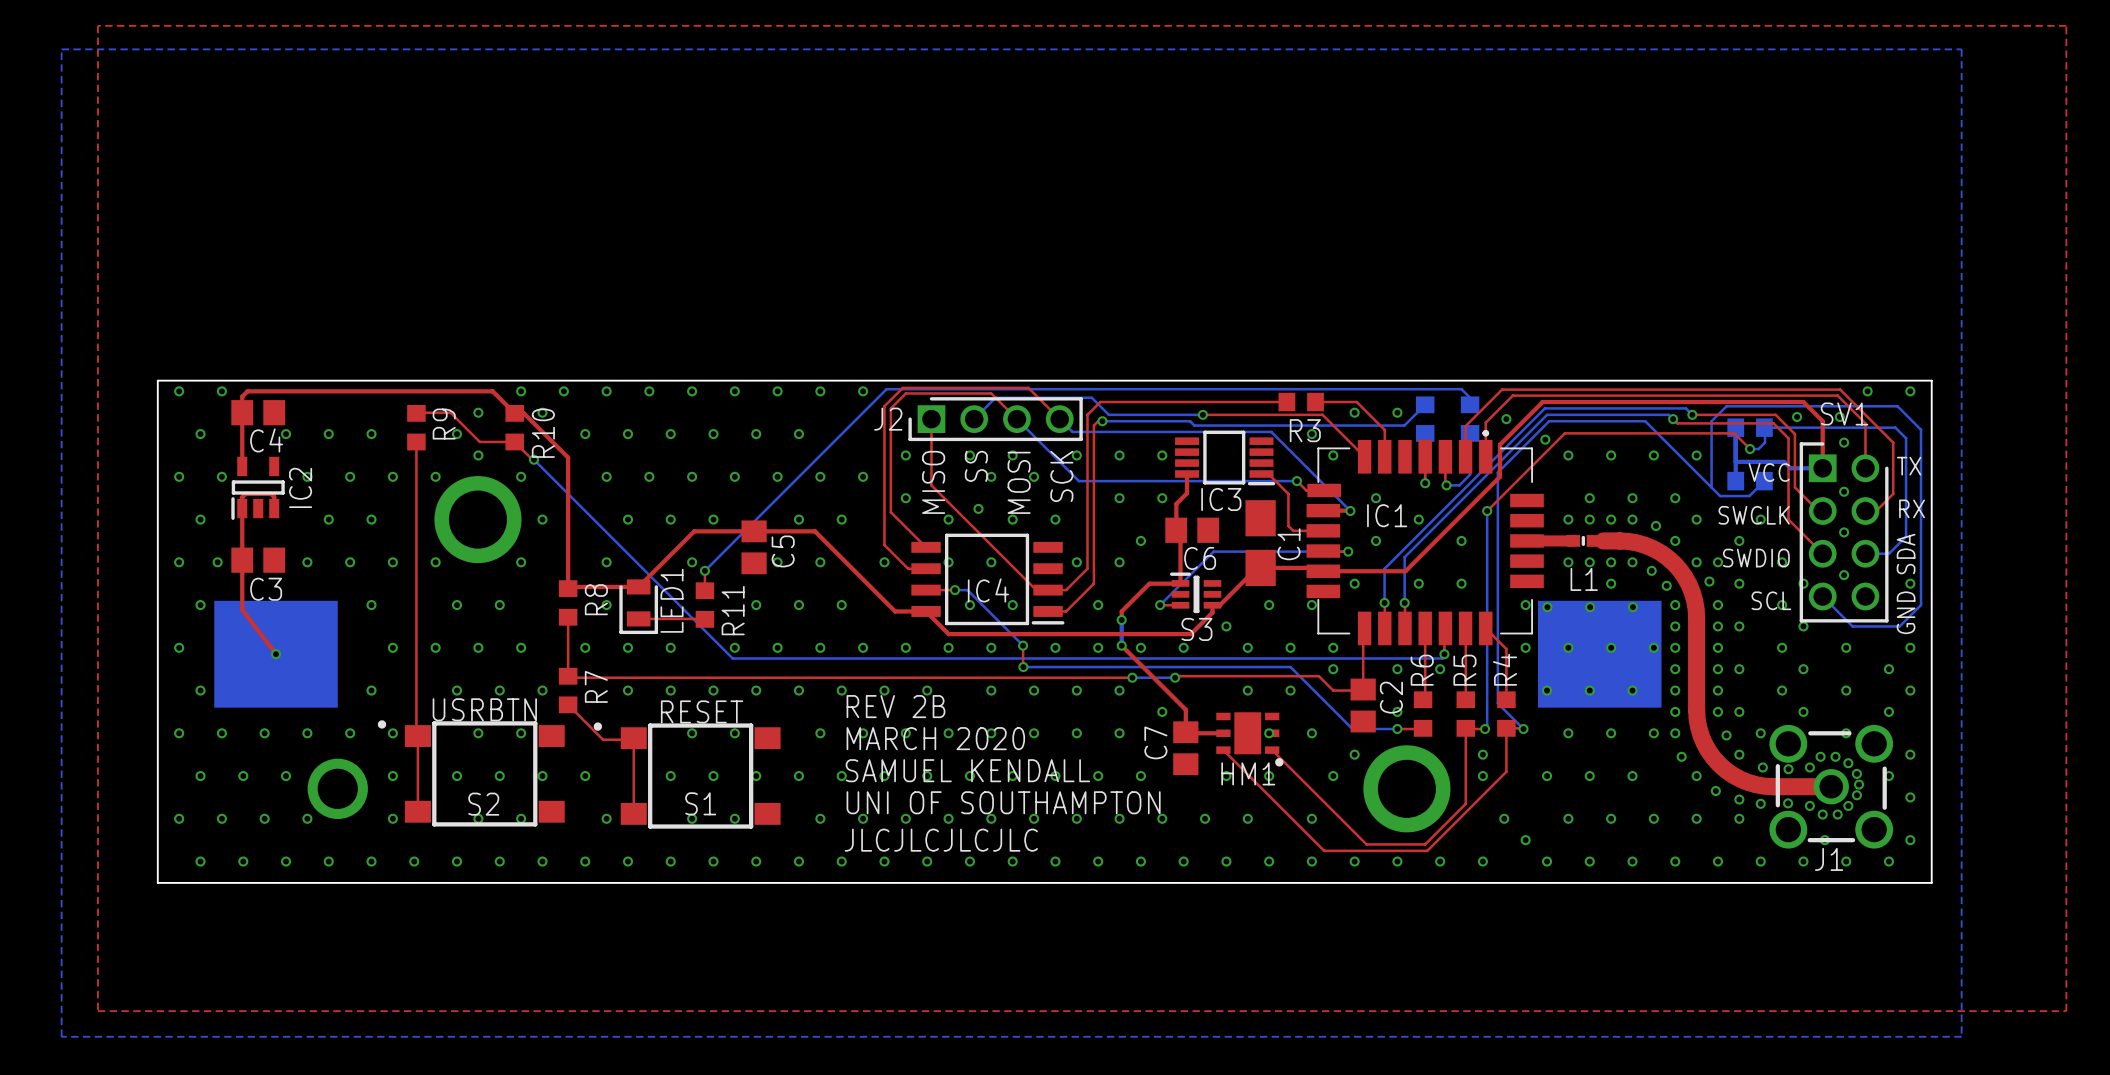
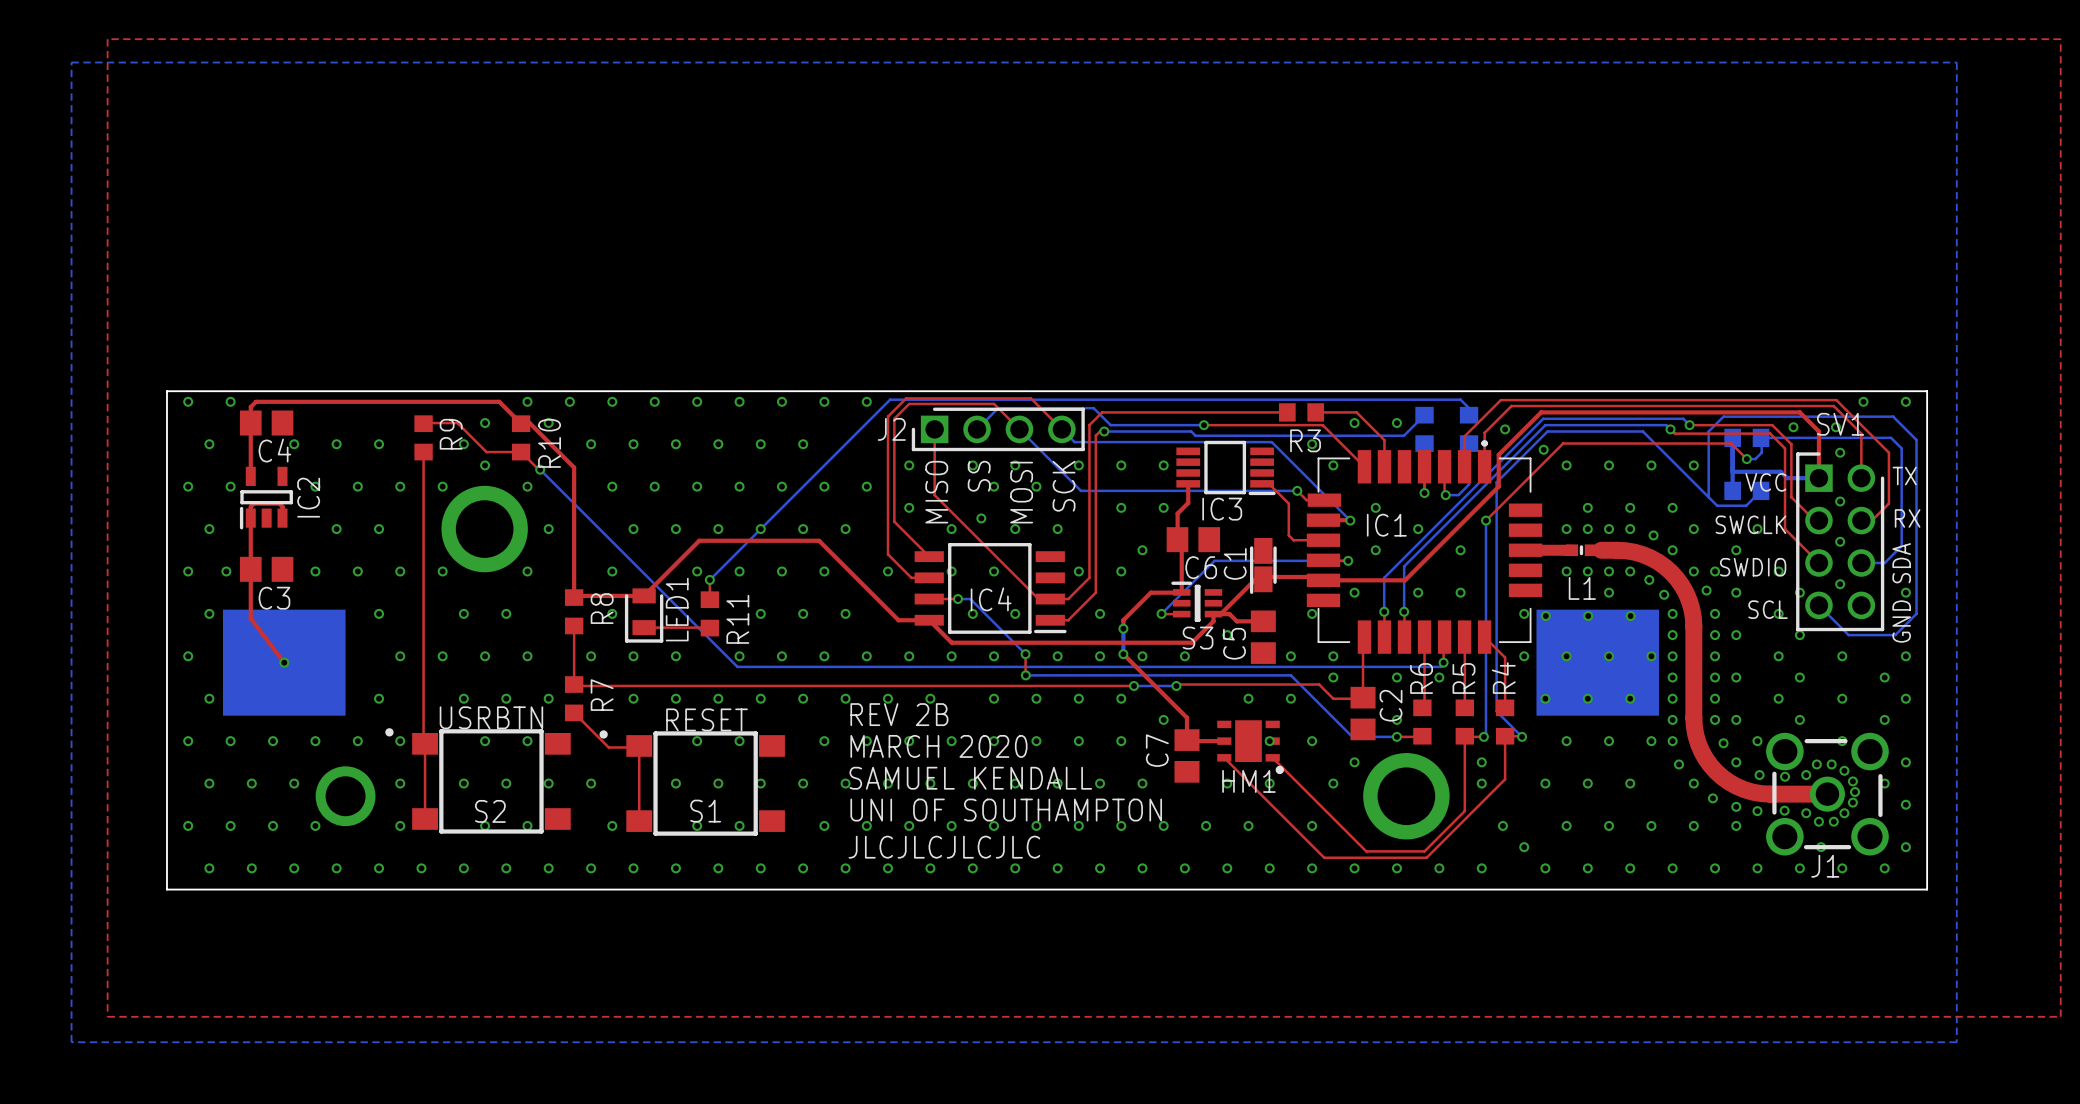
C1 footprint: [1245, 500, 1276, 586] -> [1249, 537, 1277, 594]
via: none -> (760, 529)
C1 name position: C1 (1288, 544) -> C1 (1235, 563)
C5 position: (754, 547) -> (1263, 637)
C5 name position: C5 (783, 551) -> C5 (1234, 643)
via: none -> (739, 571)
top track: none -> (1220, 614) (1229, 614) (1236, 621) (1263, 621)
via: (1269, 605) -> none
via: (1247, 647) -> none

